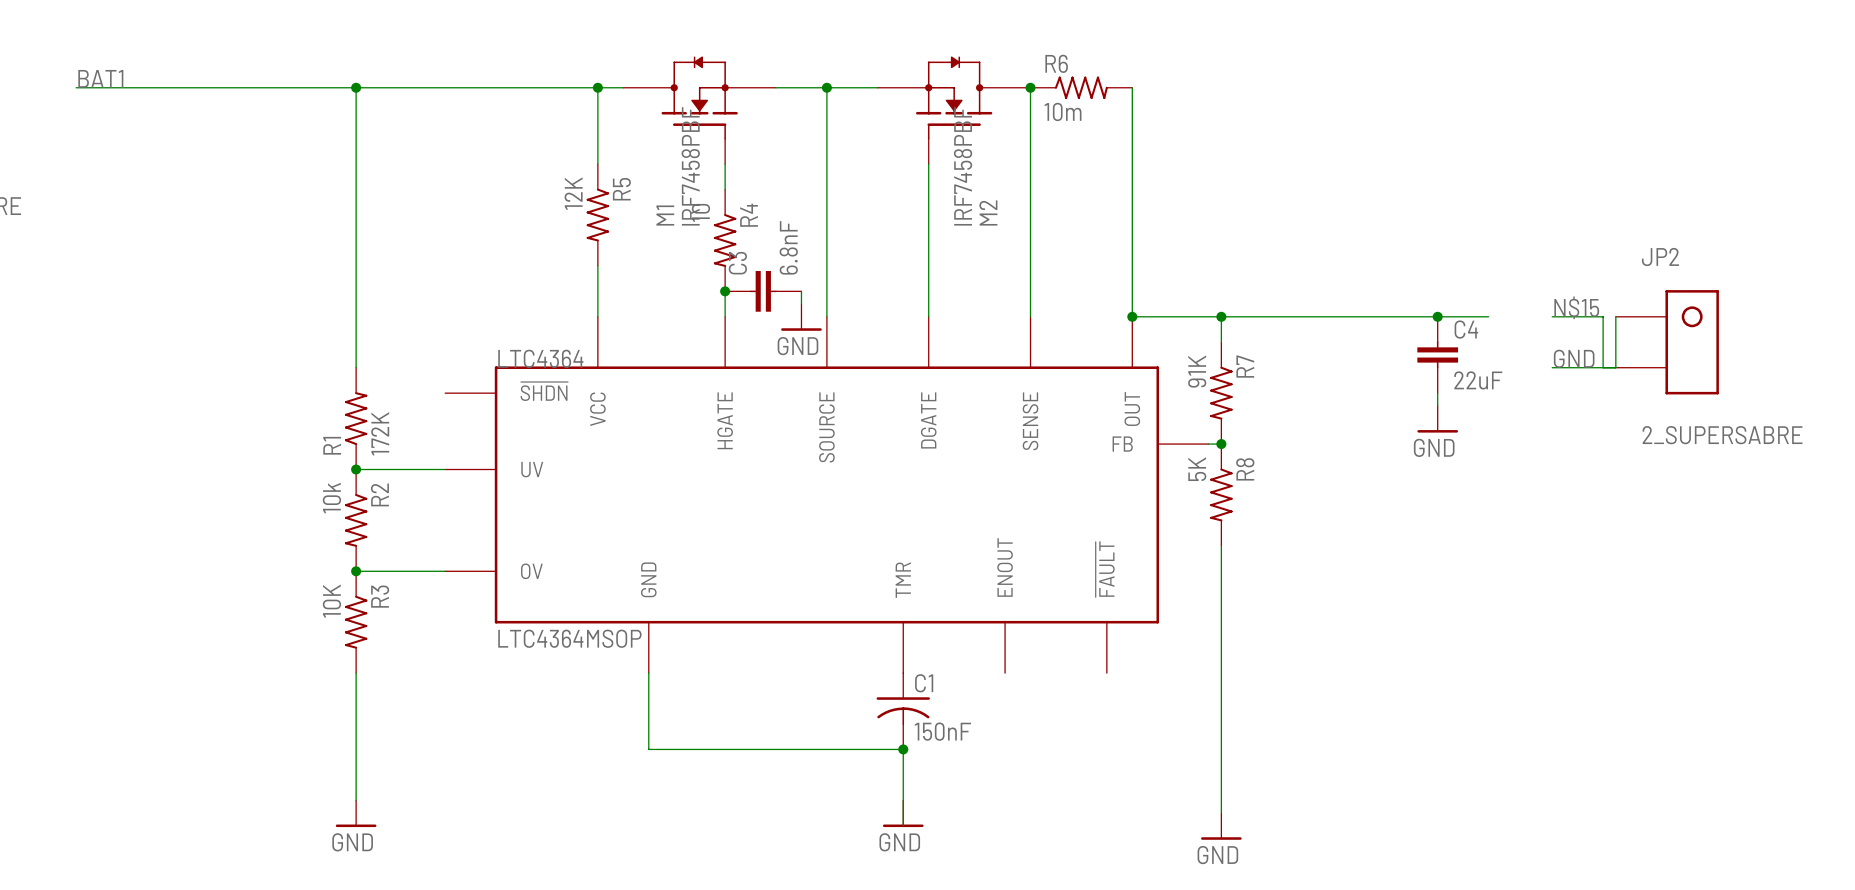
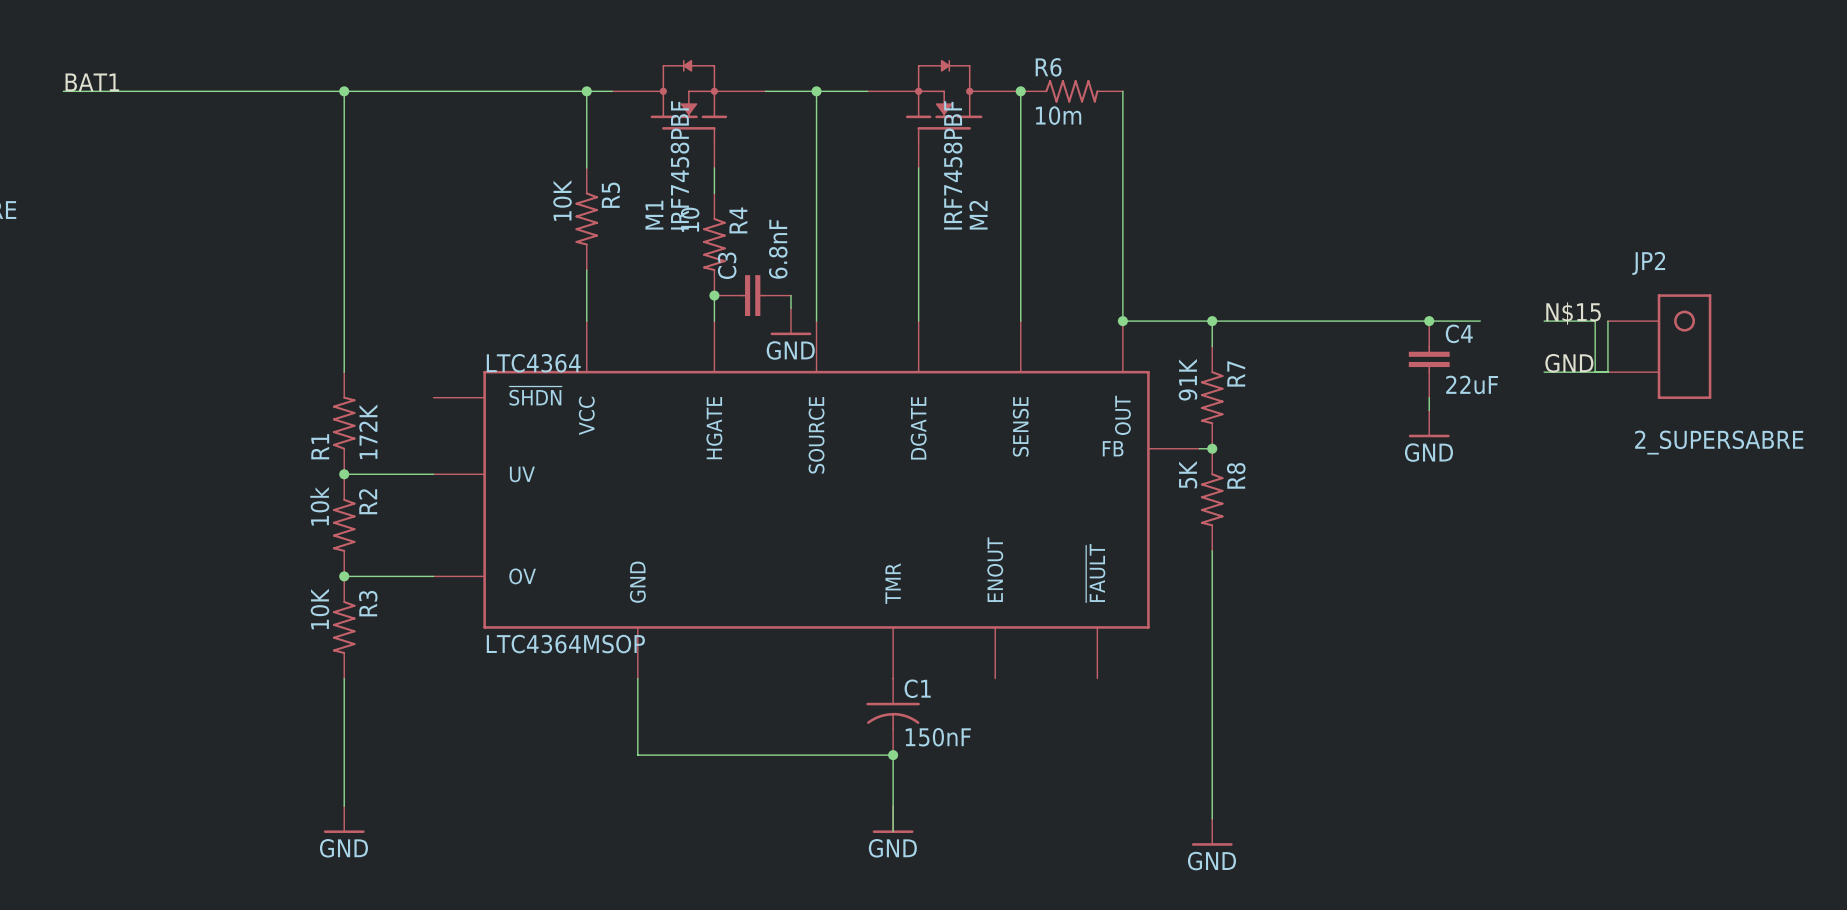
R5 value: 12K (573, 193) -> 10K (562, 200)

